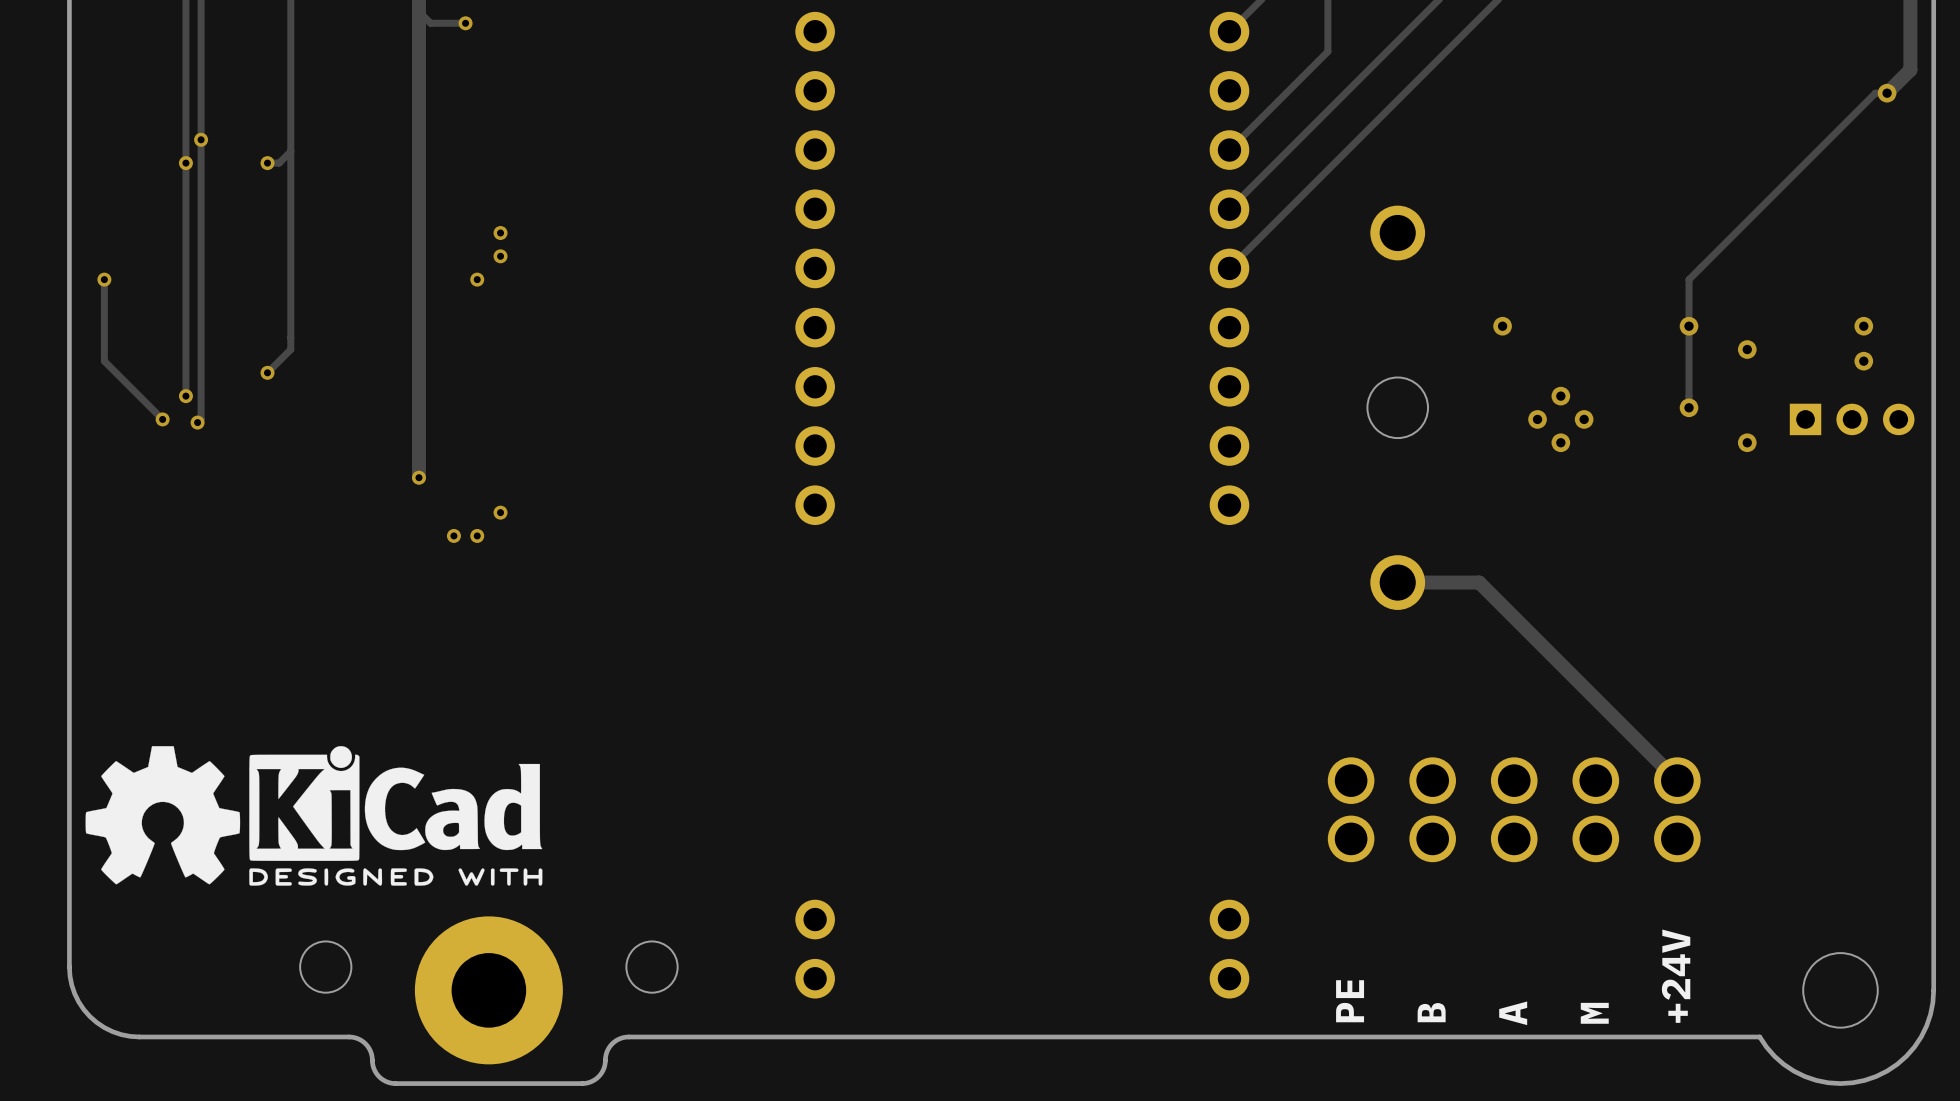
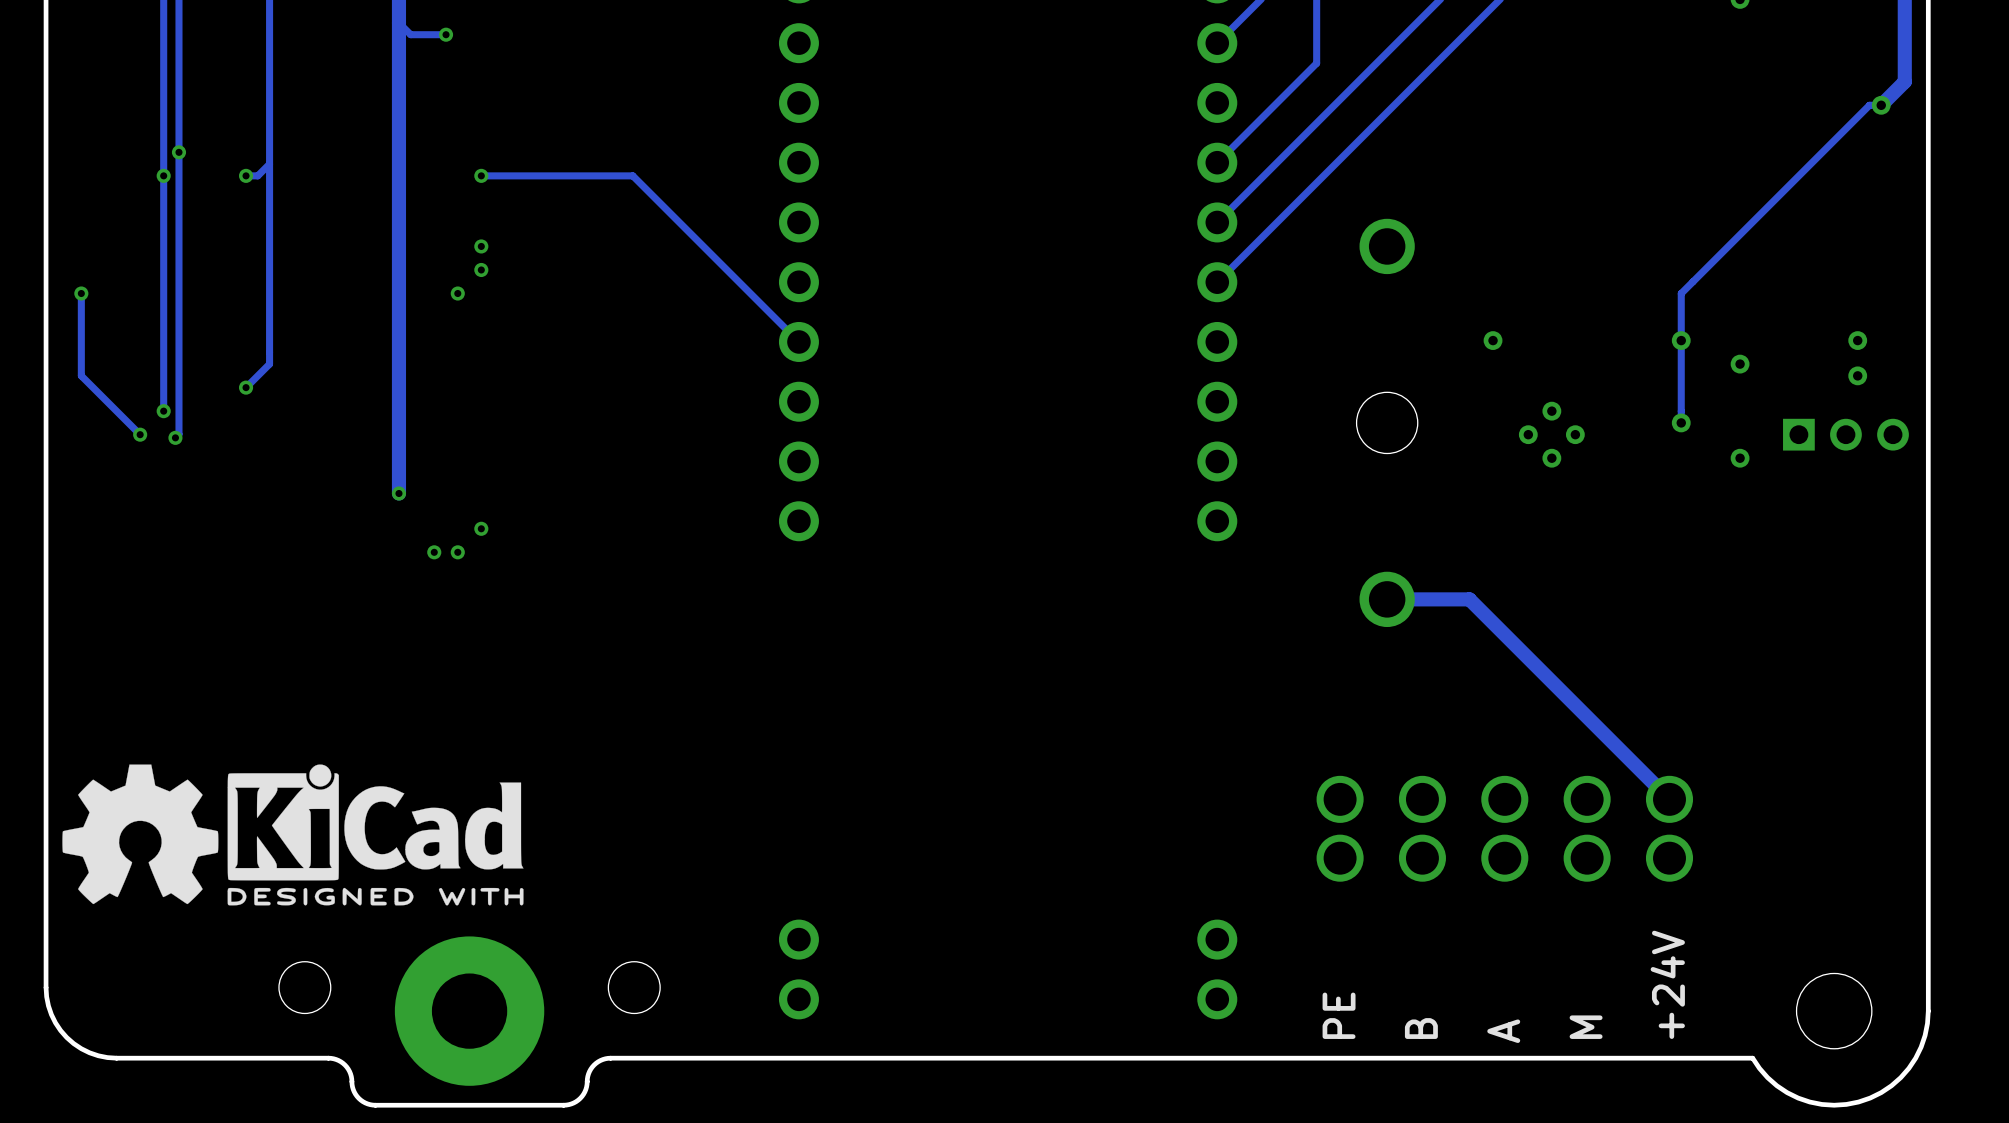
track: none -> (481, 175) (632, 175) (798, 341)
via: none -> (481, 175)

